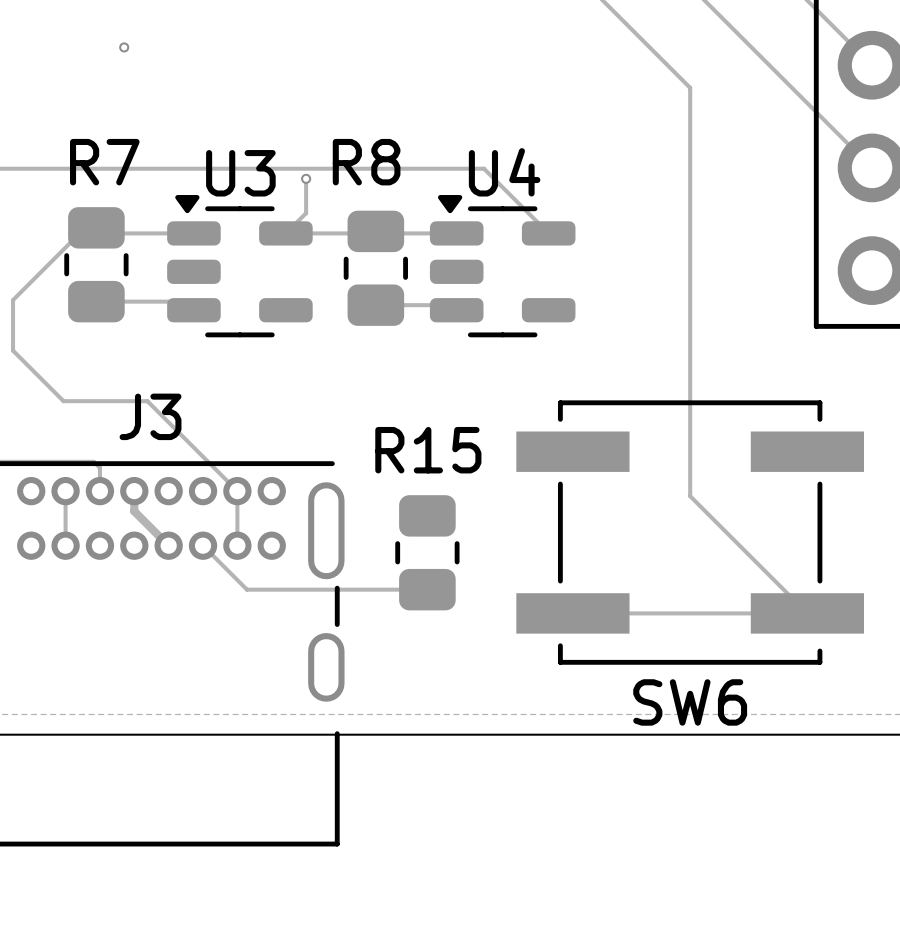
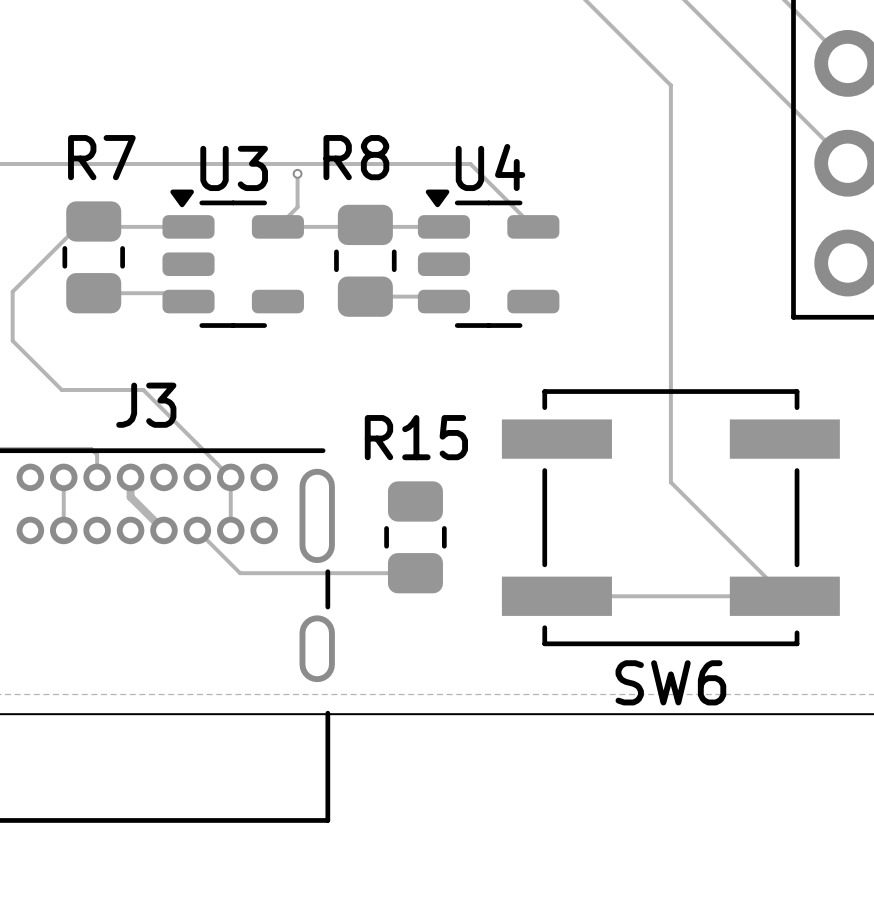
via: (124, 47) -> none

